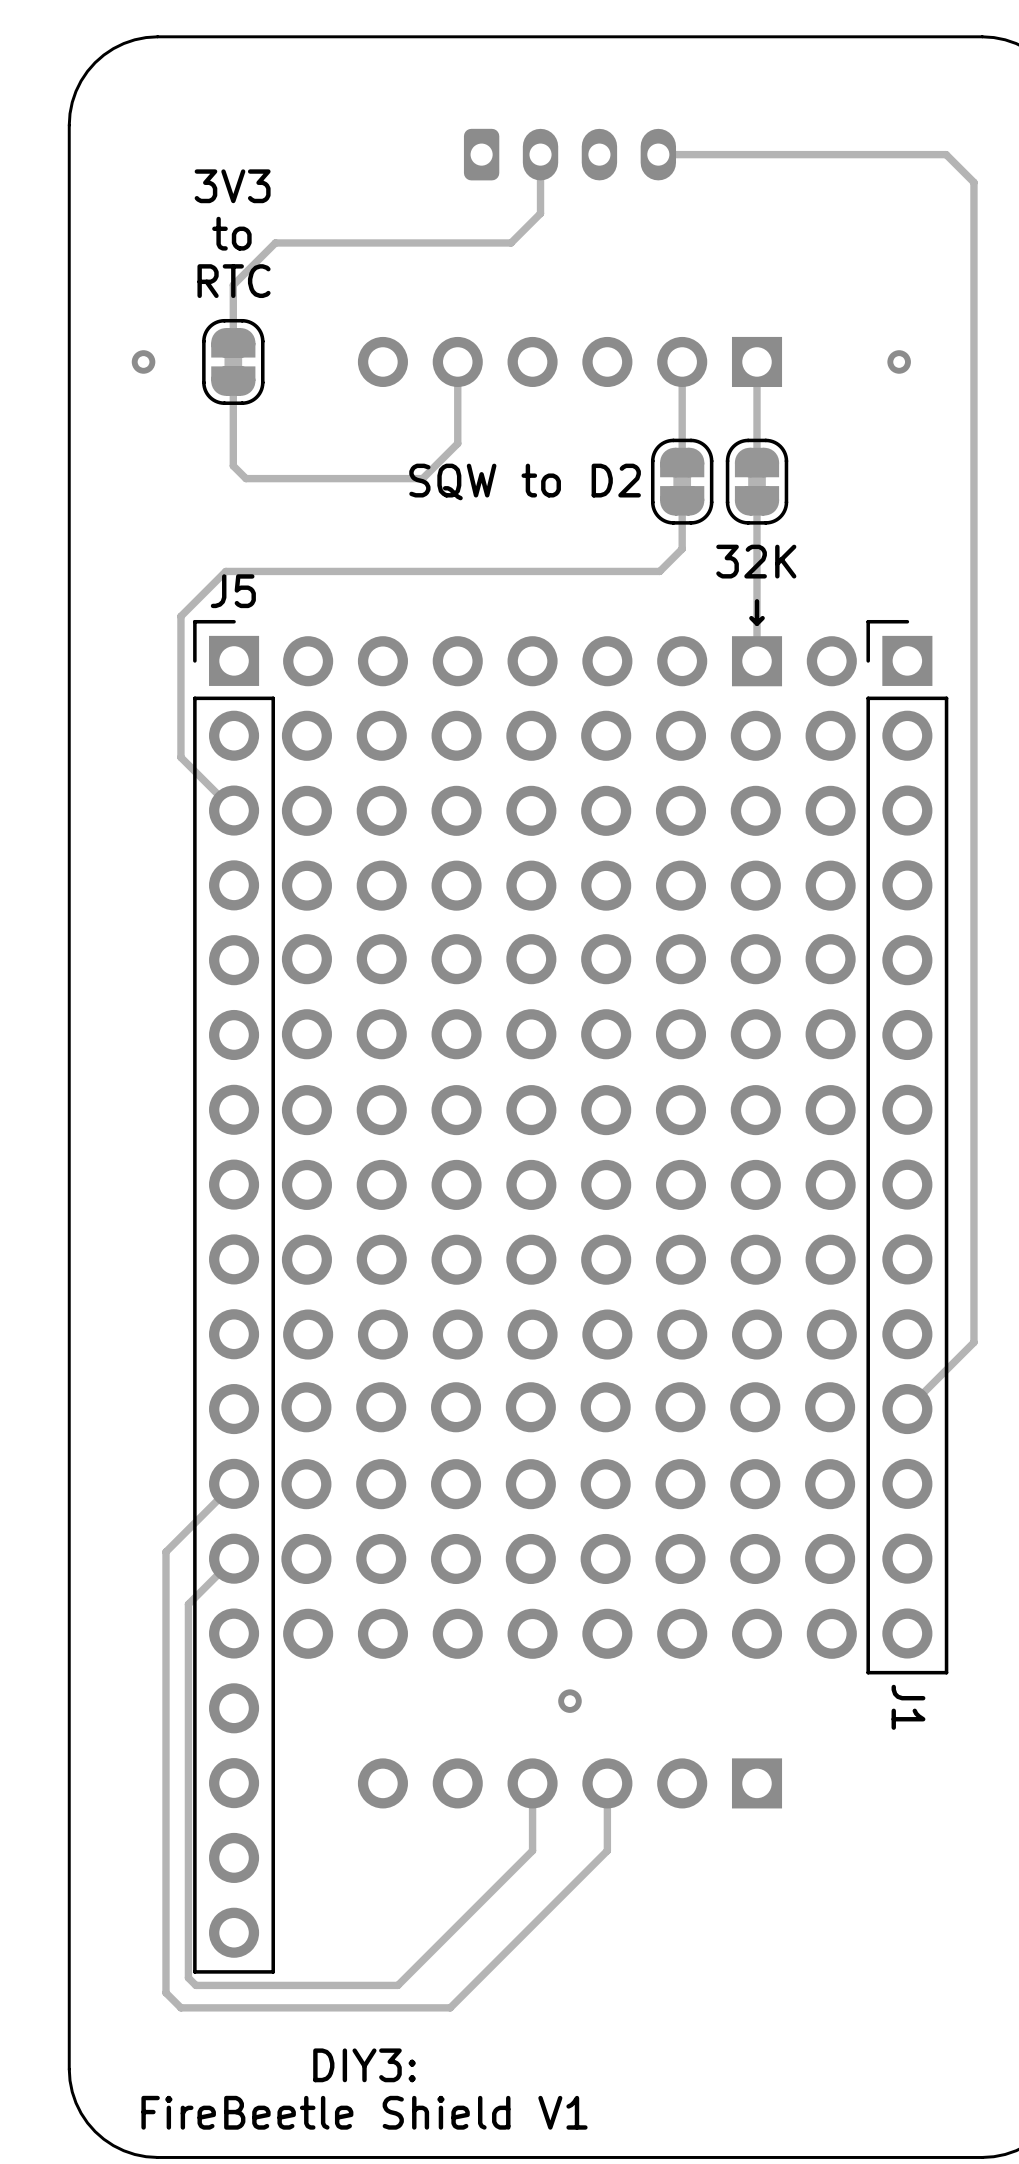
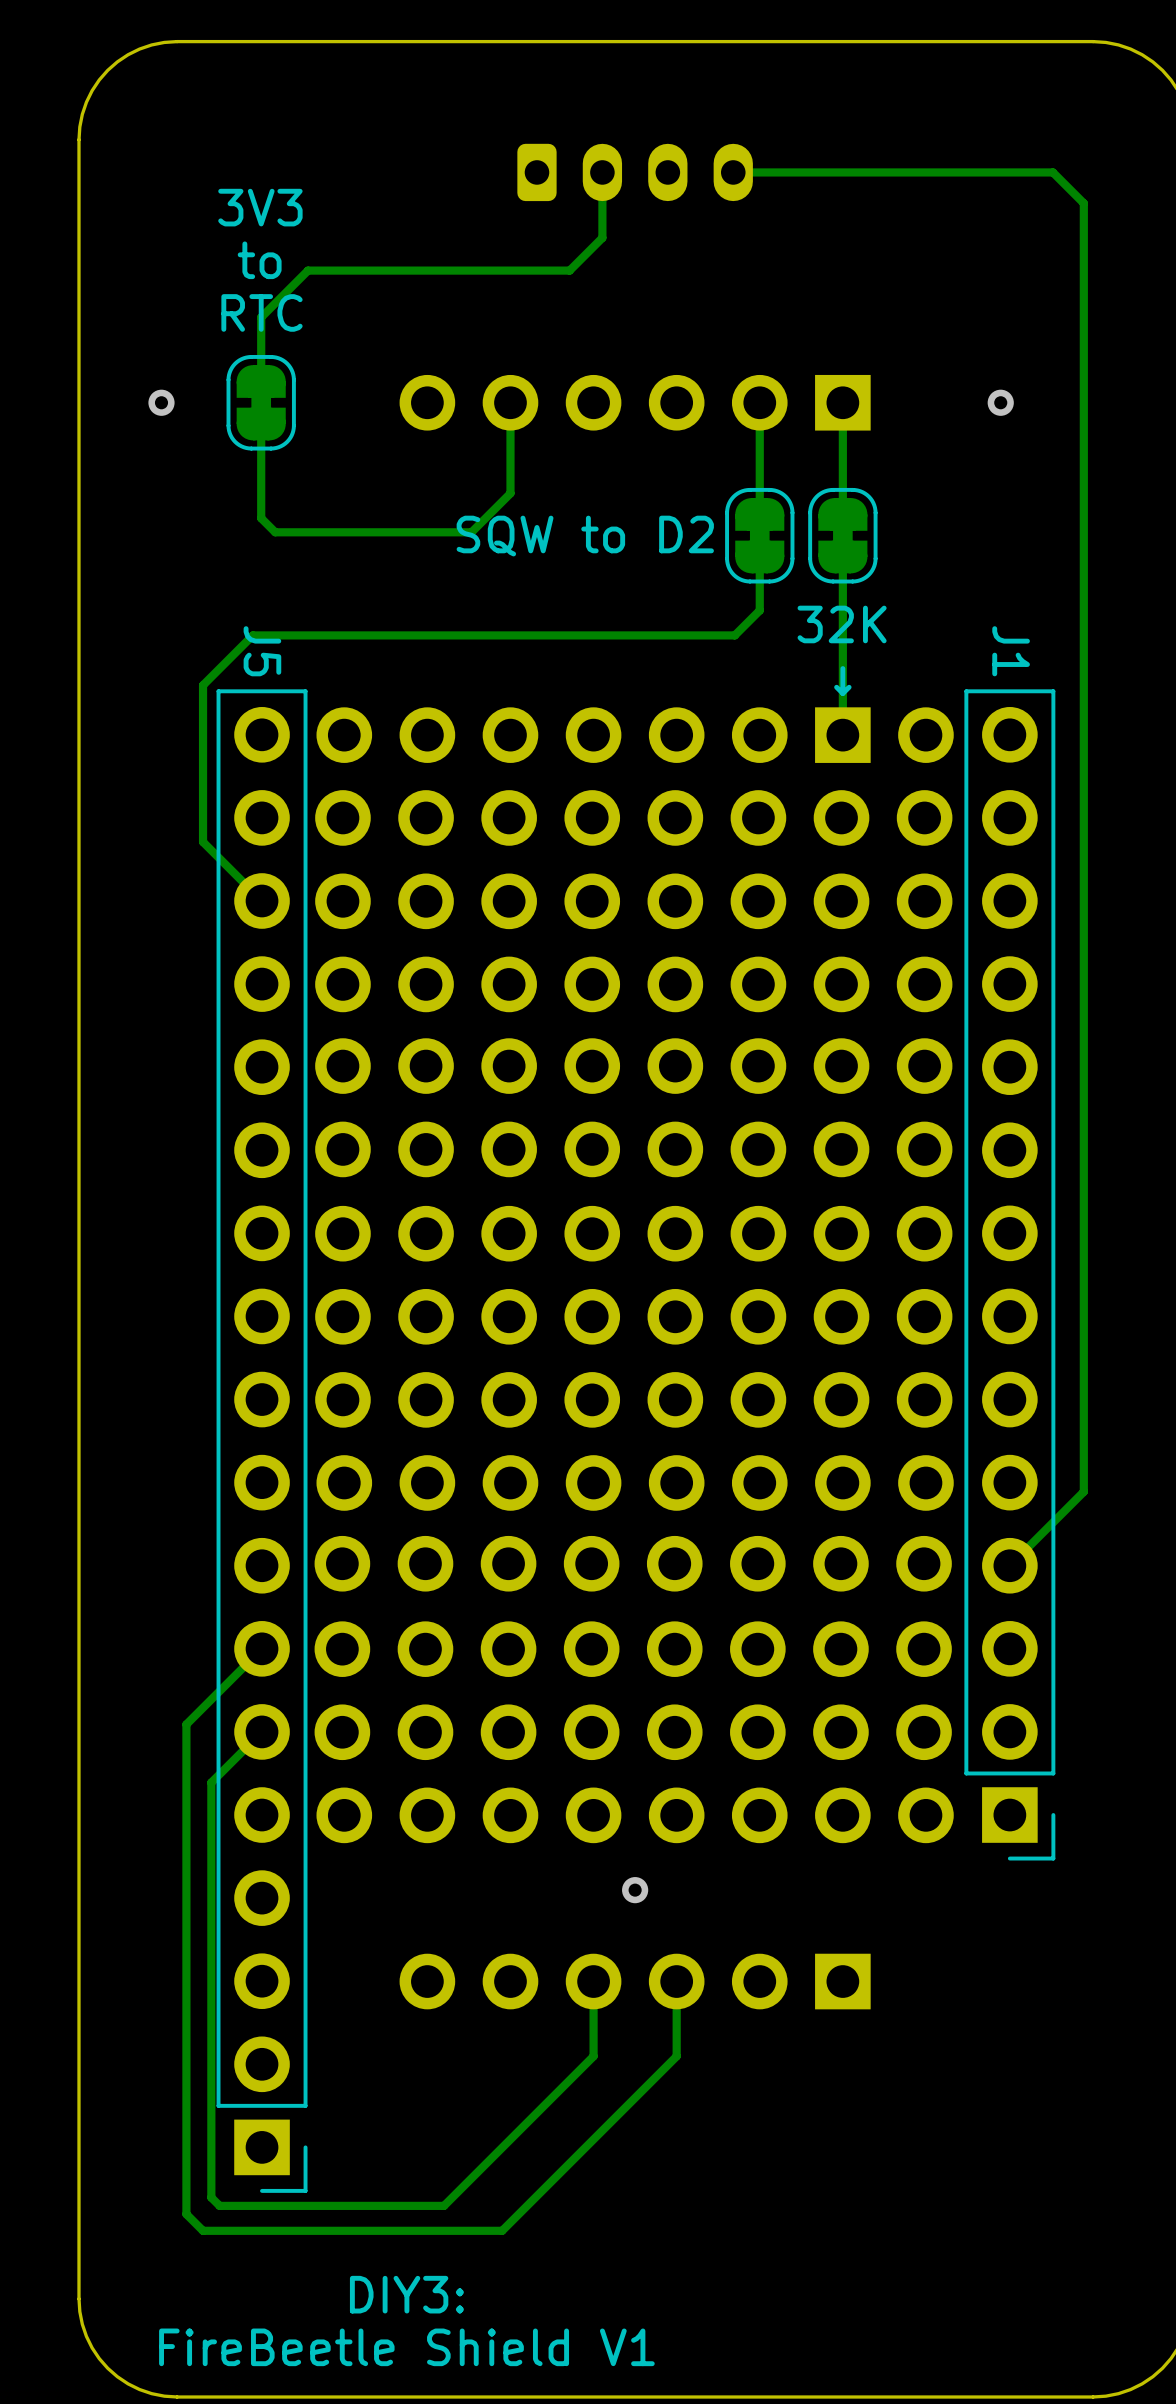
J1 rotation: 0° (907, 1147) -> 180° (1009, 1274)
J5 rotation: 0° (234, 1296) -> 180° (262, 1441)

